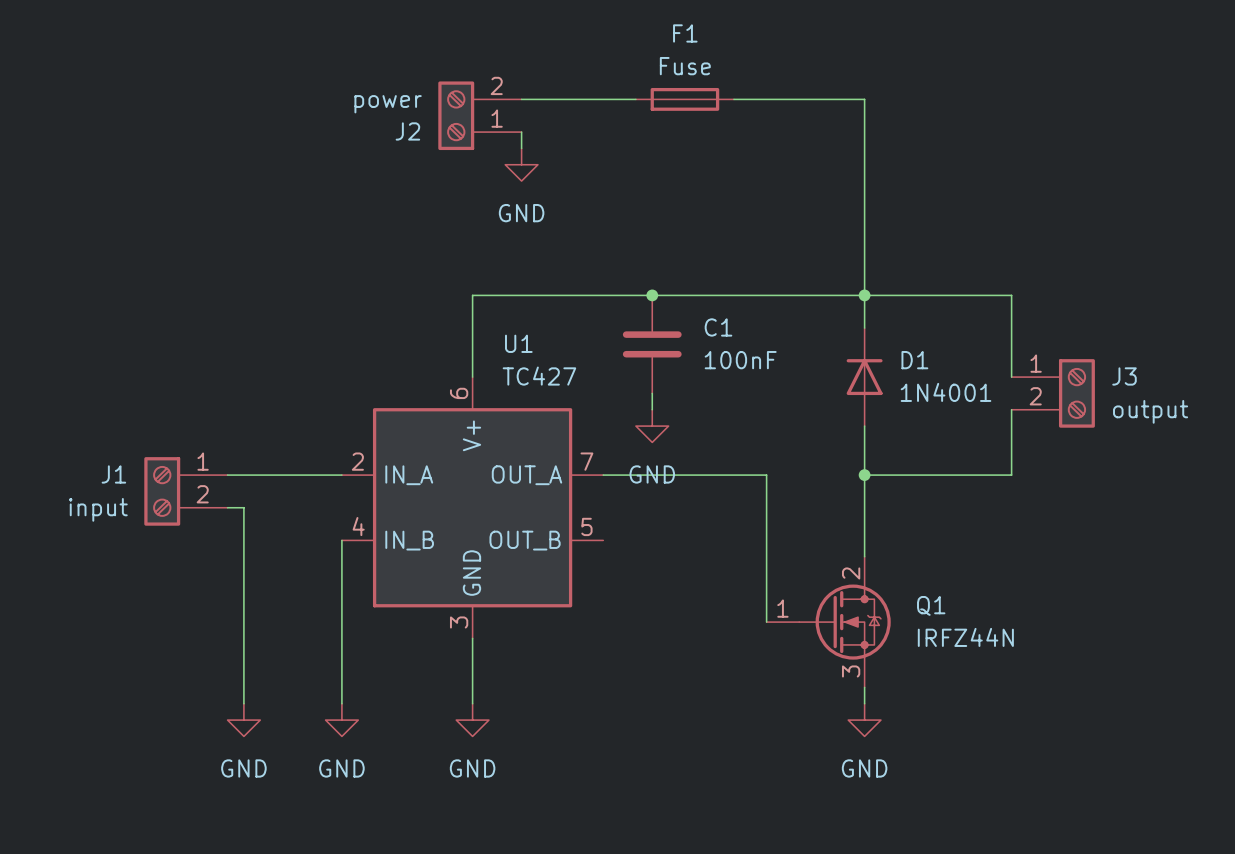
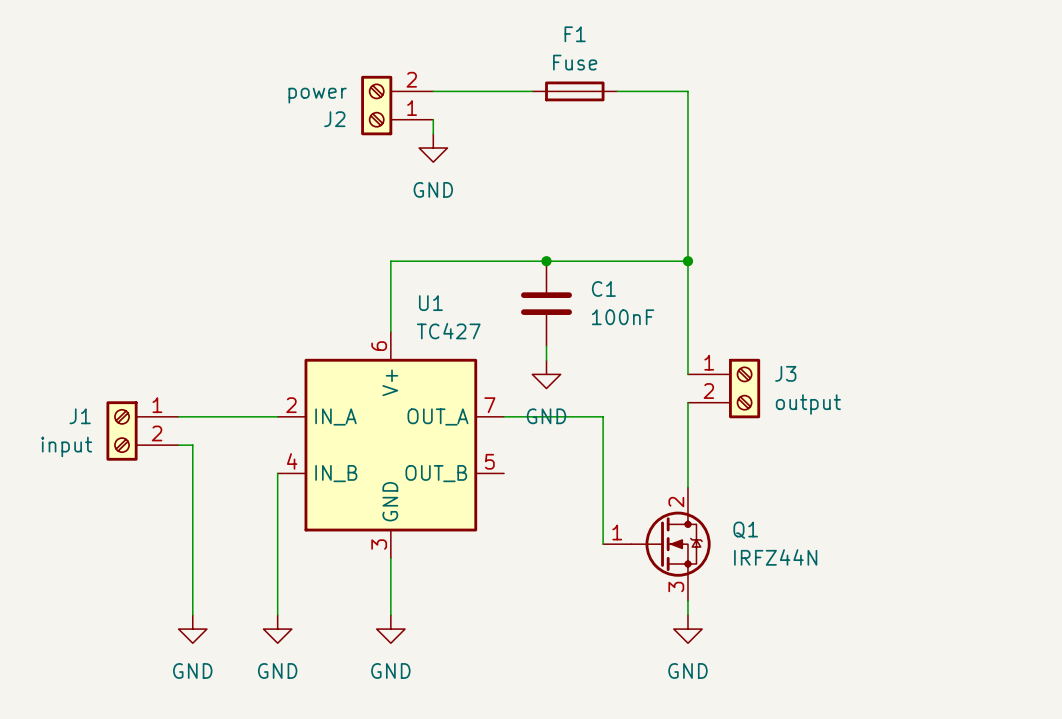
wire: (815, 99) (864, 99) (864, 328) -> (687, 91) (687, 374)
wire: (815, 295) (1011, 295) (1011, 377) -> none
junction position: (864, 295) -> (687, 261)
D1: 1N4001 (864, 377) -> none
J3 position: (1053, 393) -> (724, 388)
wire: (1011, 409) (1011, 475) (864, 475) -> none
wire: (864, 426) (864, 556) -> none
wire: none -> (687, 402) (687, 487)
wire: (717, 475) (766, 475) (766, 622) -> (603, 416) (603, 544)
junction: (864, 475) -> none
Q1 position: (828, 622) -> (656, 544)
wire: (864, 687) (864, 703) -> (687, 600) (687, 614)
power symbol position: GND (864, 720) -> GND (687, 629)

